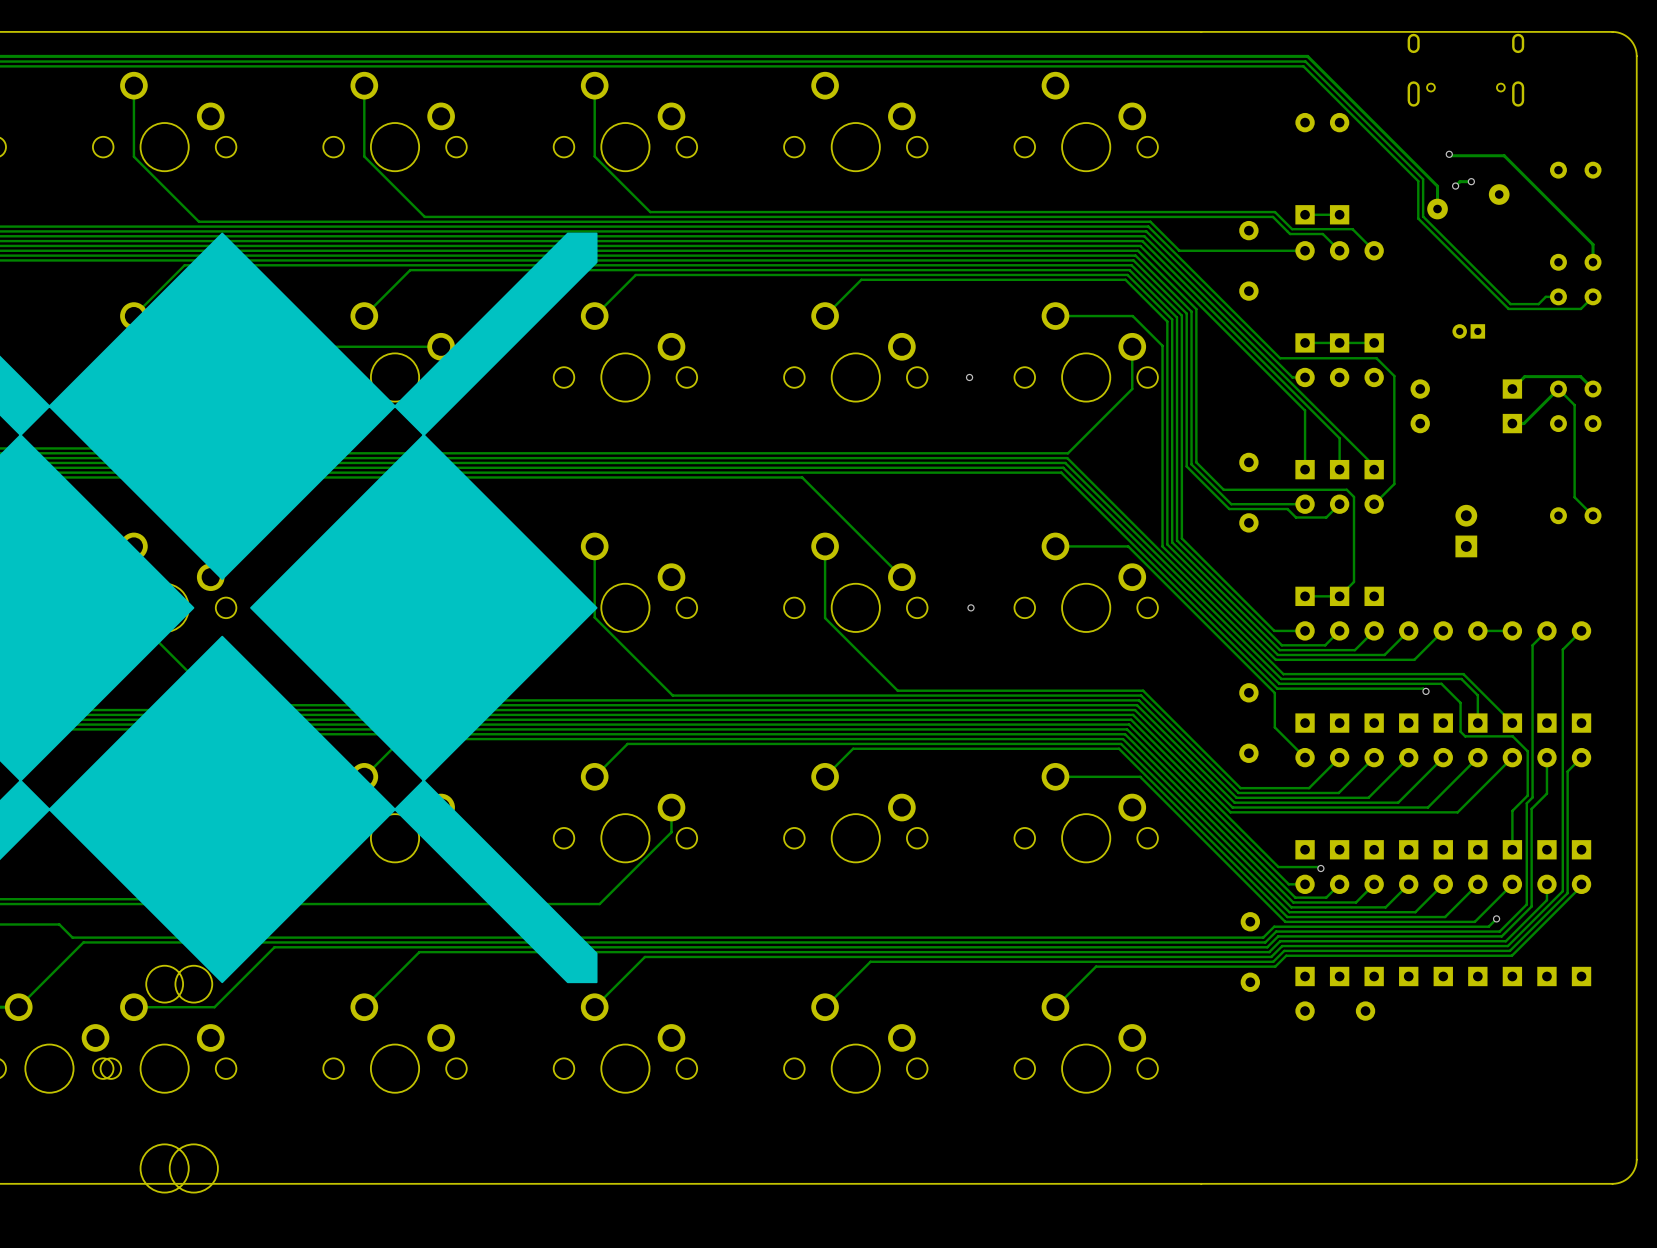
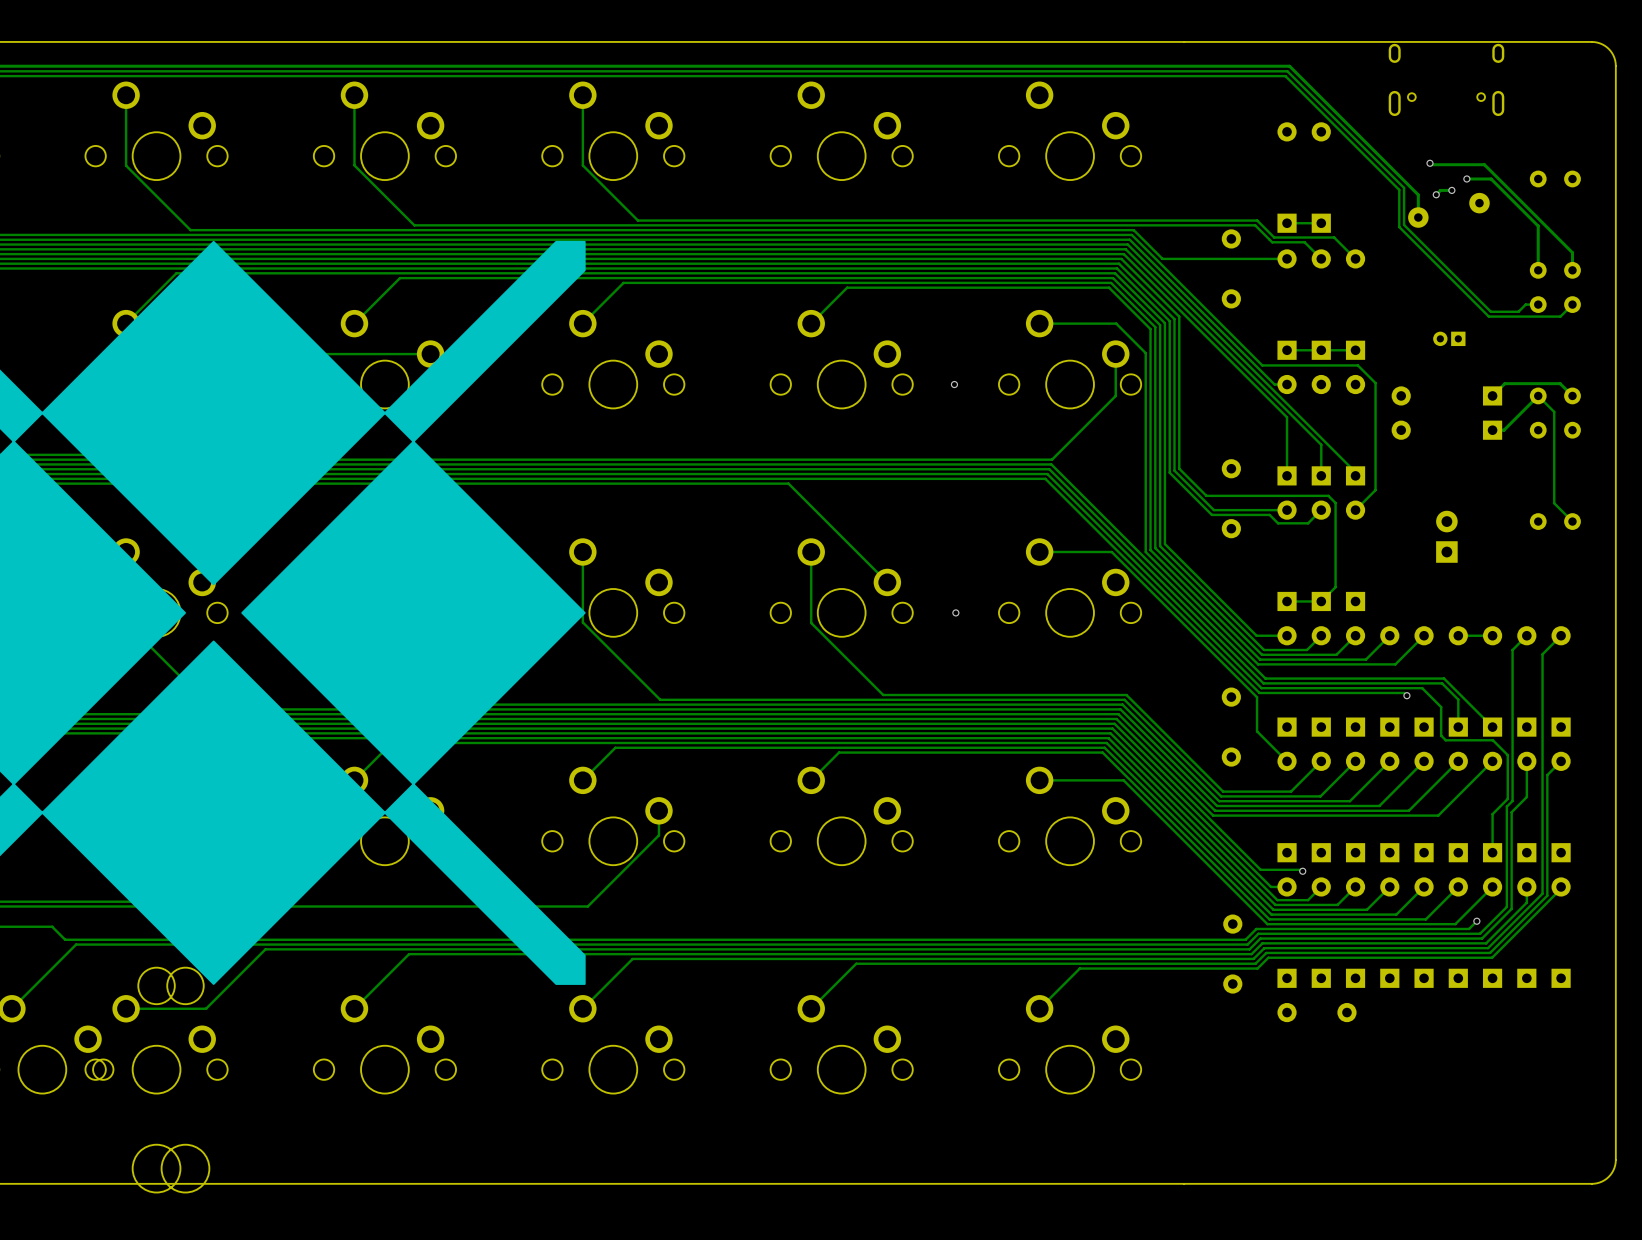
track: none -> (1466, 178) (1491, 178) (1538, 226) (1538, 270)
via: none -> (1466, 178)

